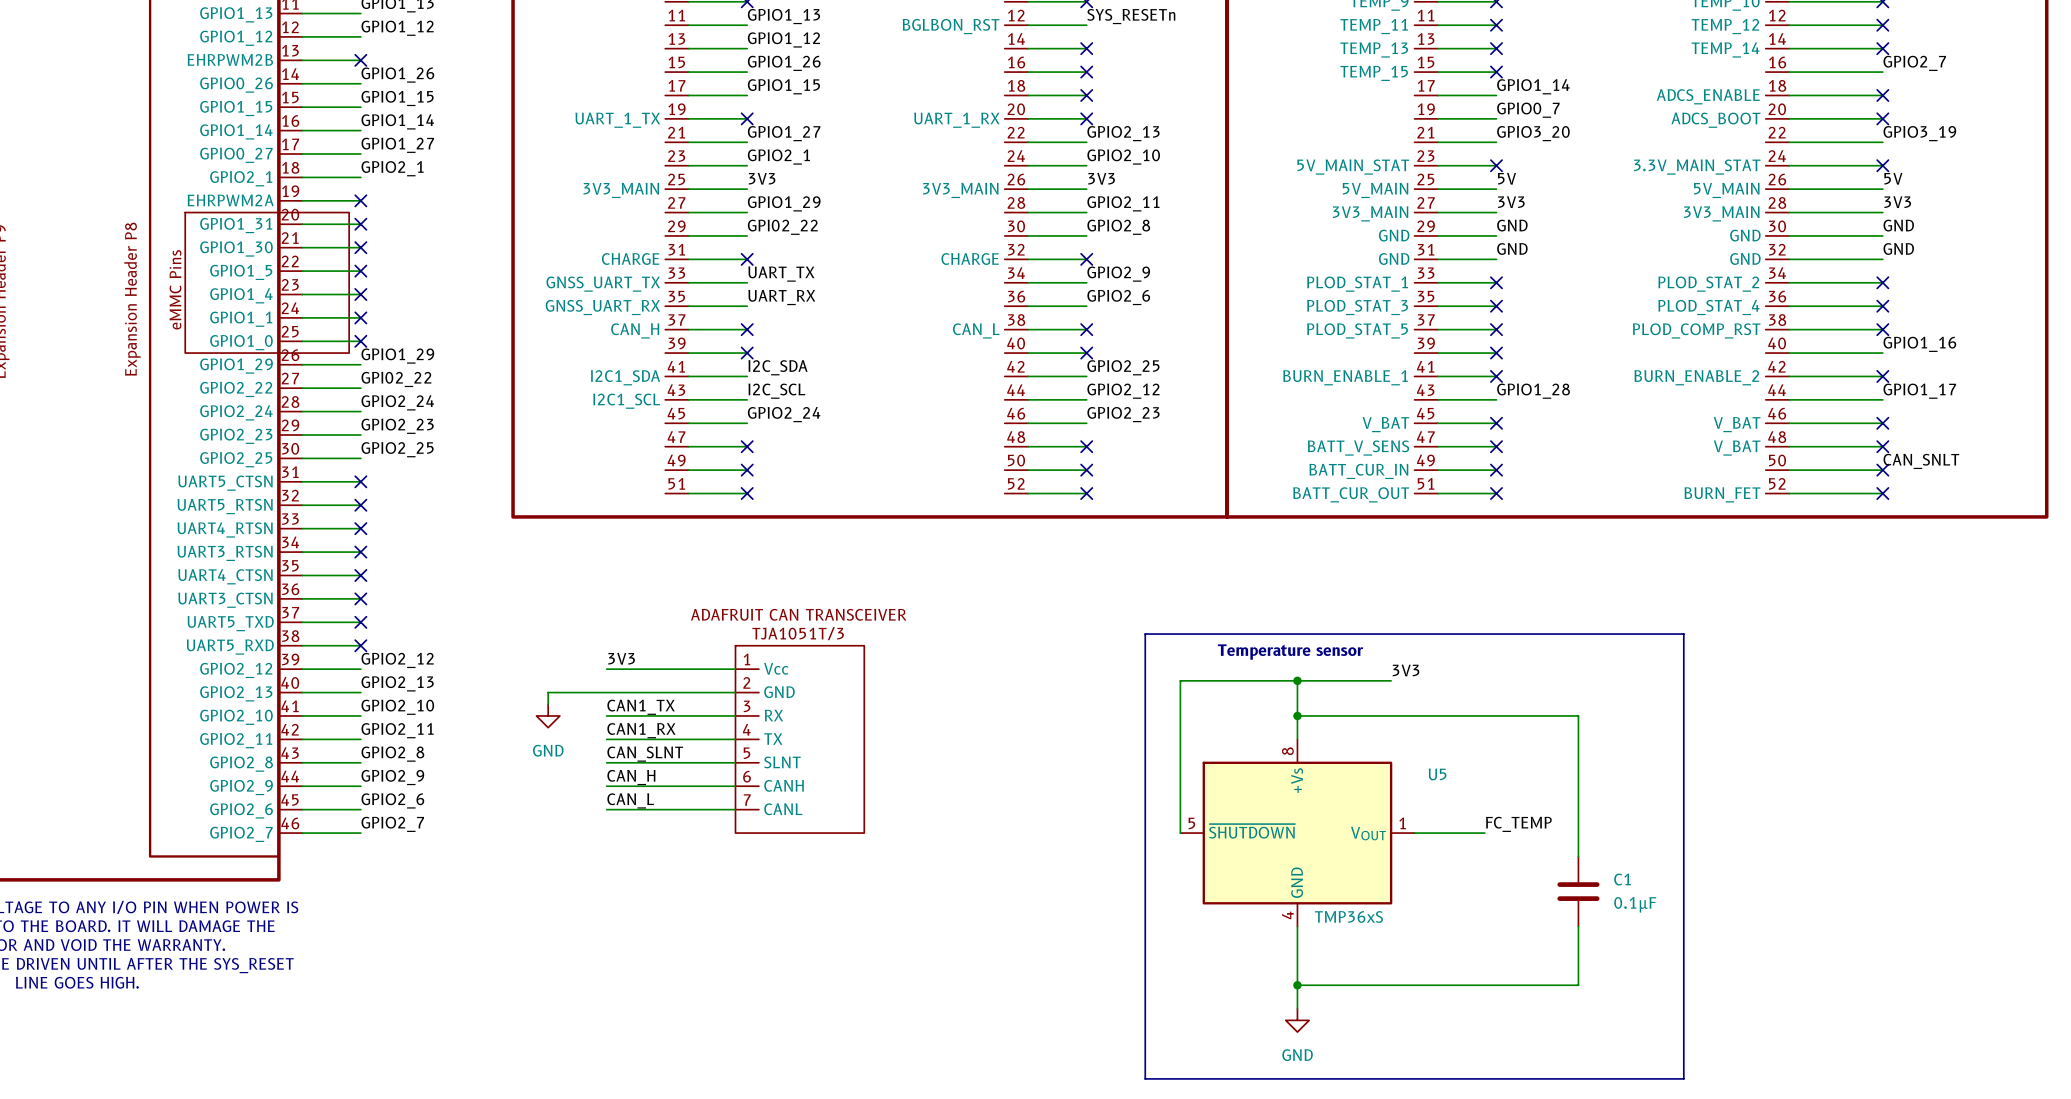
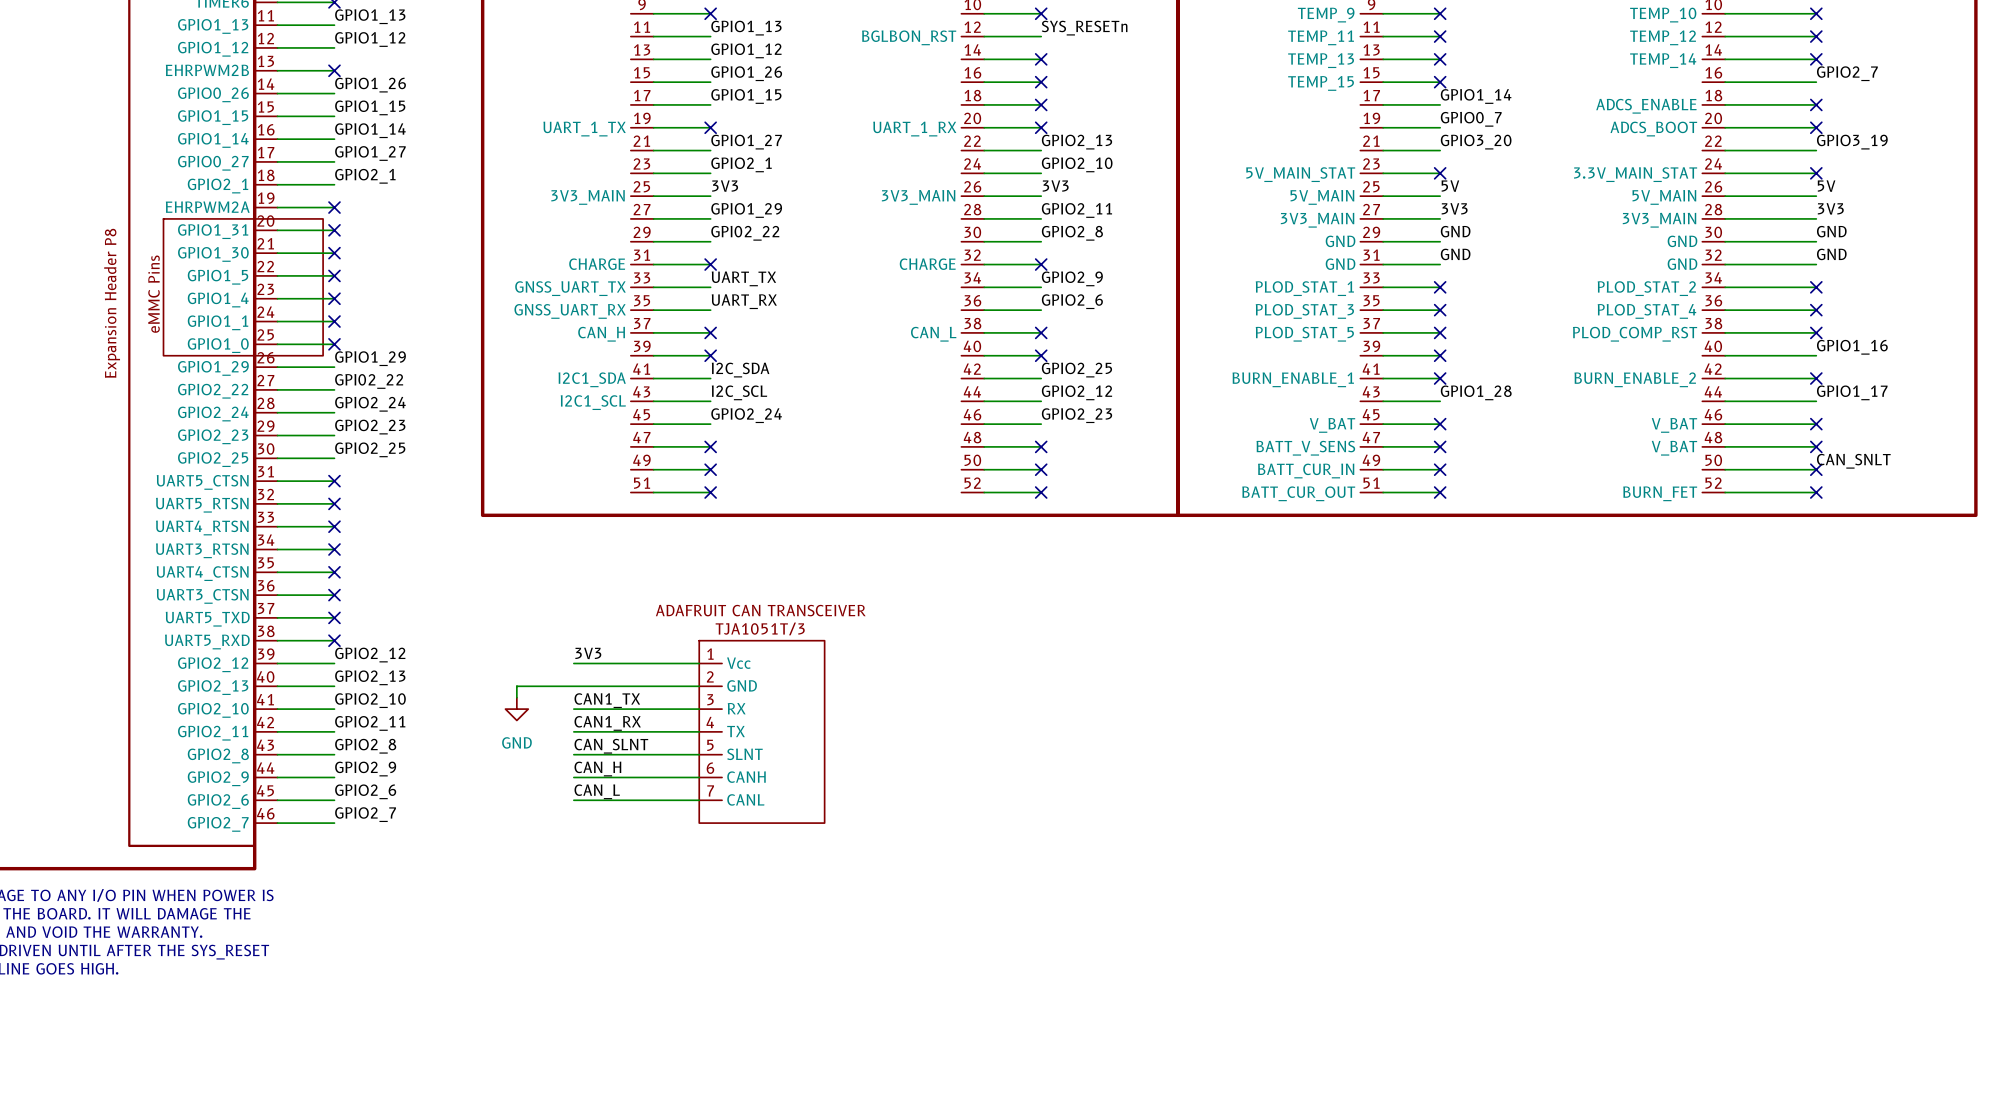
line: (1145, 634) (1683, 634) (1683, 1078) (1145, 1078) (1145, 634) -> none
text: Temperature sensor (1290, 652) -> none
label: 3V3 (1405, 670) -> none
wire: (1297, 680) (1297, 739) -> none
junction: (1297, 680) -> none
wire: (1391, 680) (1180, 680) (1180, 833) -> none
wire: (1297, 715) (1578, 715) (1578, 856) -> none
junction: (1297, 715) -> none
label: FC_TEMP (1518, 824) -> none
U5: TMP36xS (1297, 833) -> none
wire: (1414, 833) (1484, 833) -> none
C1: 0.1µF (1578, 891) -> none
wire: (1297, 926) (1297, 1008) -> none
wire: (1578, 926) (1578, 985) (1297, 985) -> none
junction: (1297, 985) -> none
power symbol: GND (1297, 1020) -> none

